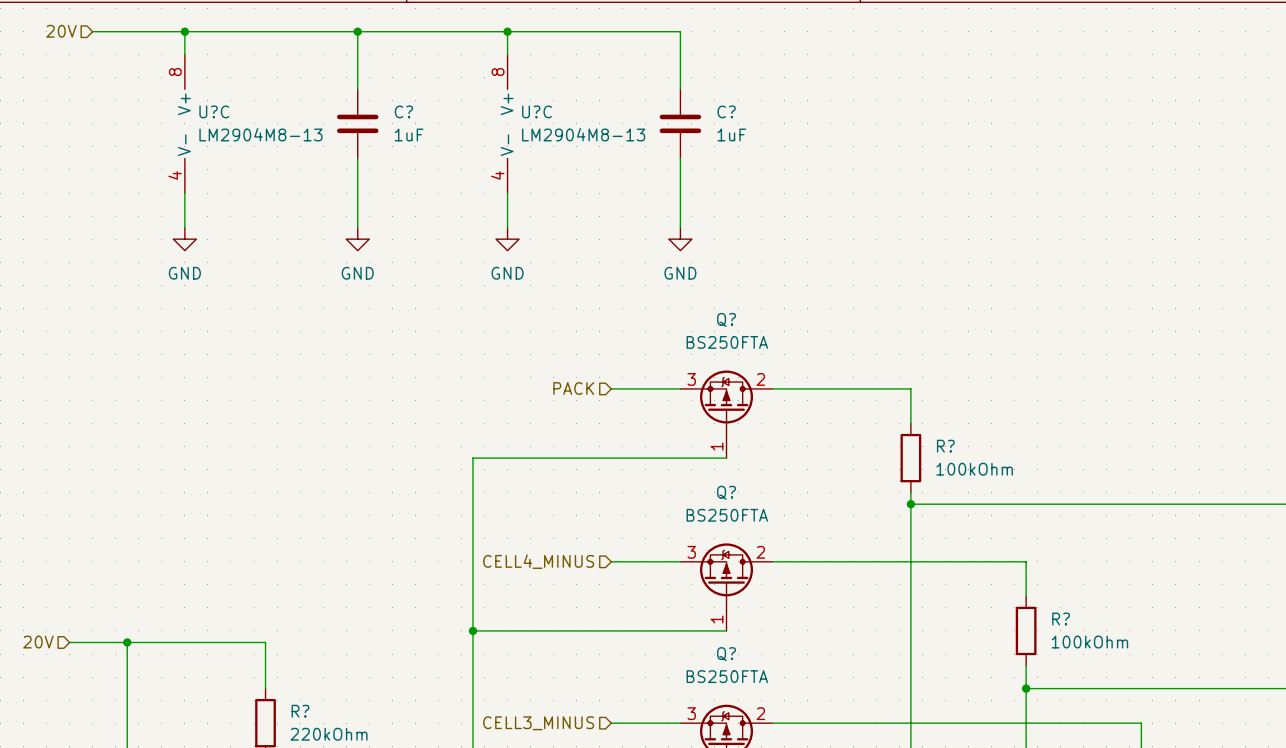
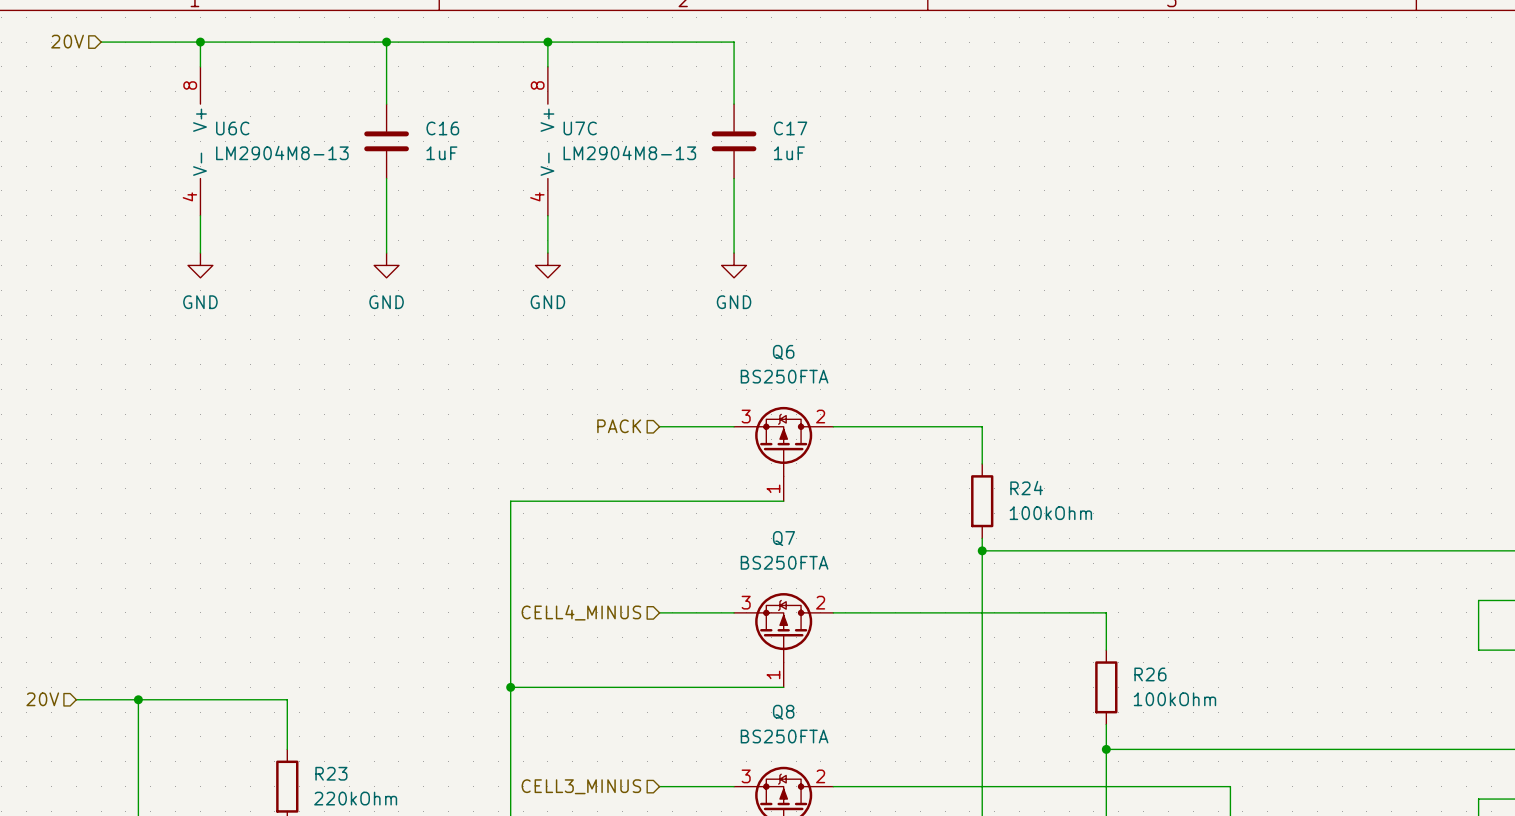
U?C name: U?C (214, 111) -> U6C (232, 128)
C? name: C? (403, 111) -> C16 (442, 128)
U?C name: U?C (537, 111) -> U7C (580, 128)
C? name: C? (726, 111) -> C17 (790, 128)
Q? name: Q? (726, 319) -> Q6 (783, 352)
R? name: R? (945, 446) -> R24 (1026, 488)
Q? name: Q? (726, 492) -> Q7 (783, 538)
R? name: R? (1061, 619) -> R26 (1150, 674)
Q? name: Q? (726, 654) -> Q8 (783, 712)
R? name: R? (300, 711) -> R23 (331, 773)

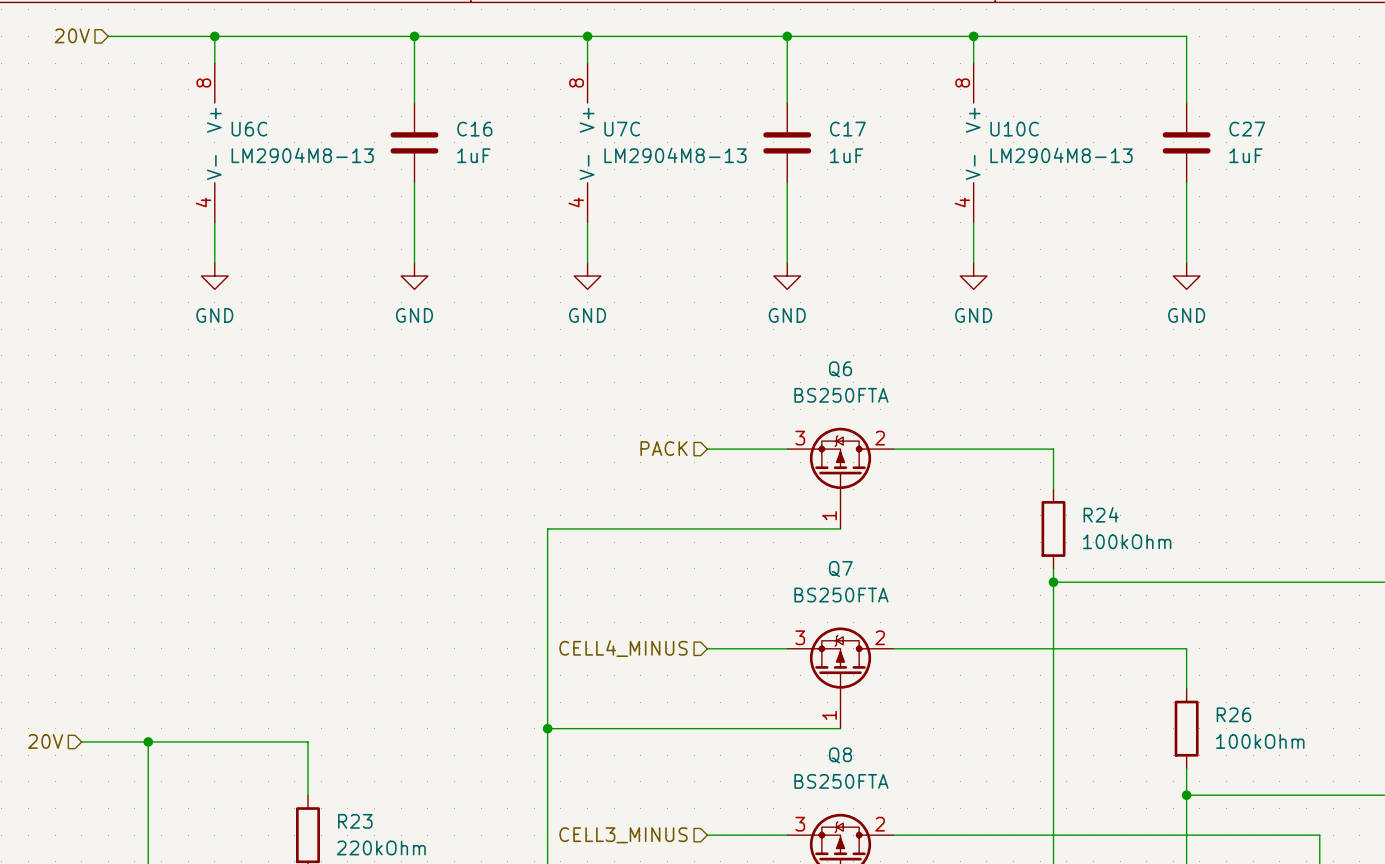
wire: none -> (787, 36) (1186, 36) (1186, 102)
junction: none -> (787, 36)
wire: none -> (973, 36) (973, 63)
junction: none -> (973, 36)
U10C: none -> LM2904M8-13 (973, 142)
C27: none -> 1uF (1186, 142)
wire: none -> (1186, 182) (1186, 262)
wire: none -> (973, 222) (973, 262)
power symbol: none -> GND (973, 276)
power symbol: none -> GND (1186, 276)

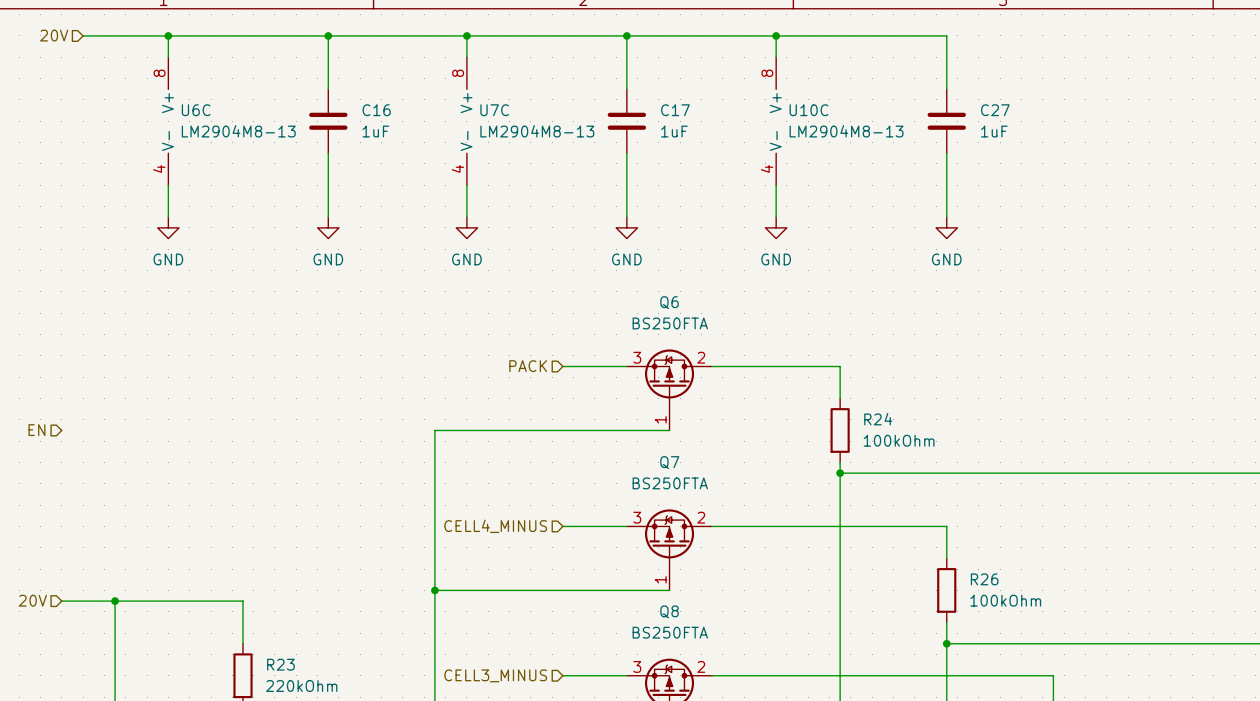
hierarchical label: none -> EN (36, 430)

